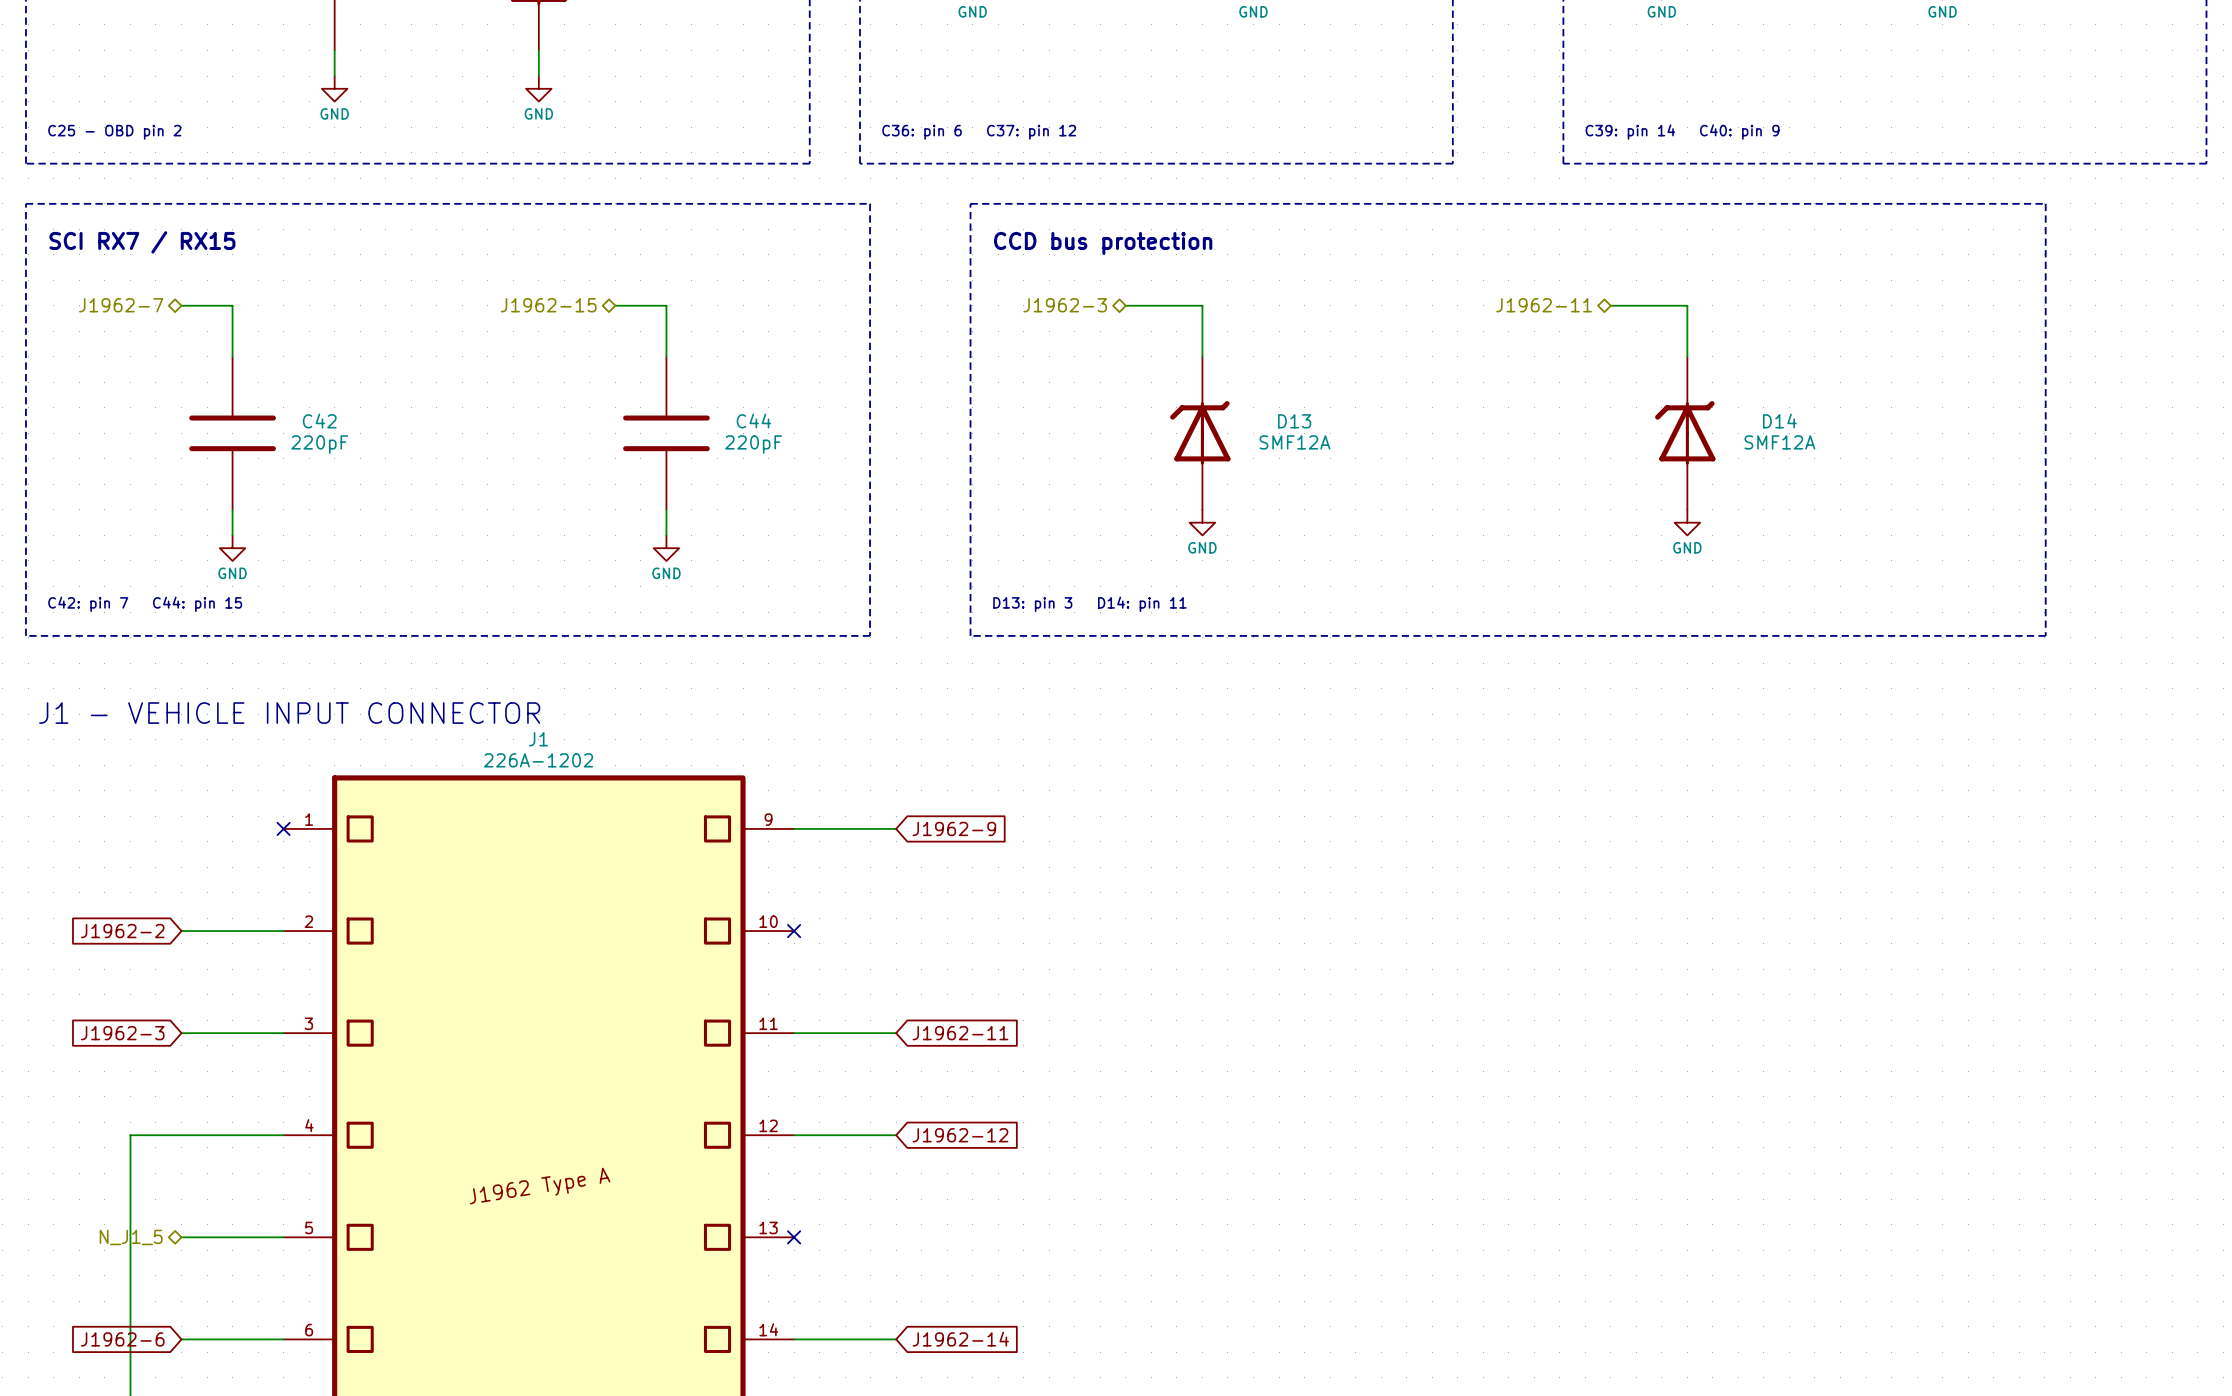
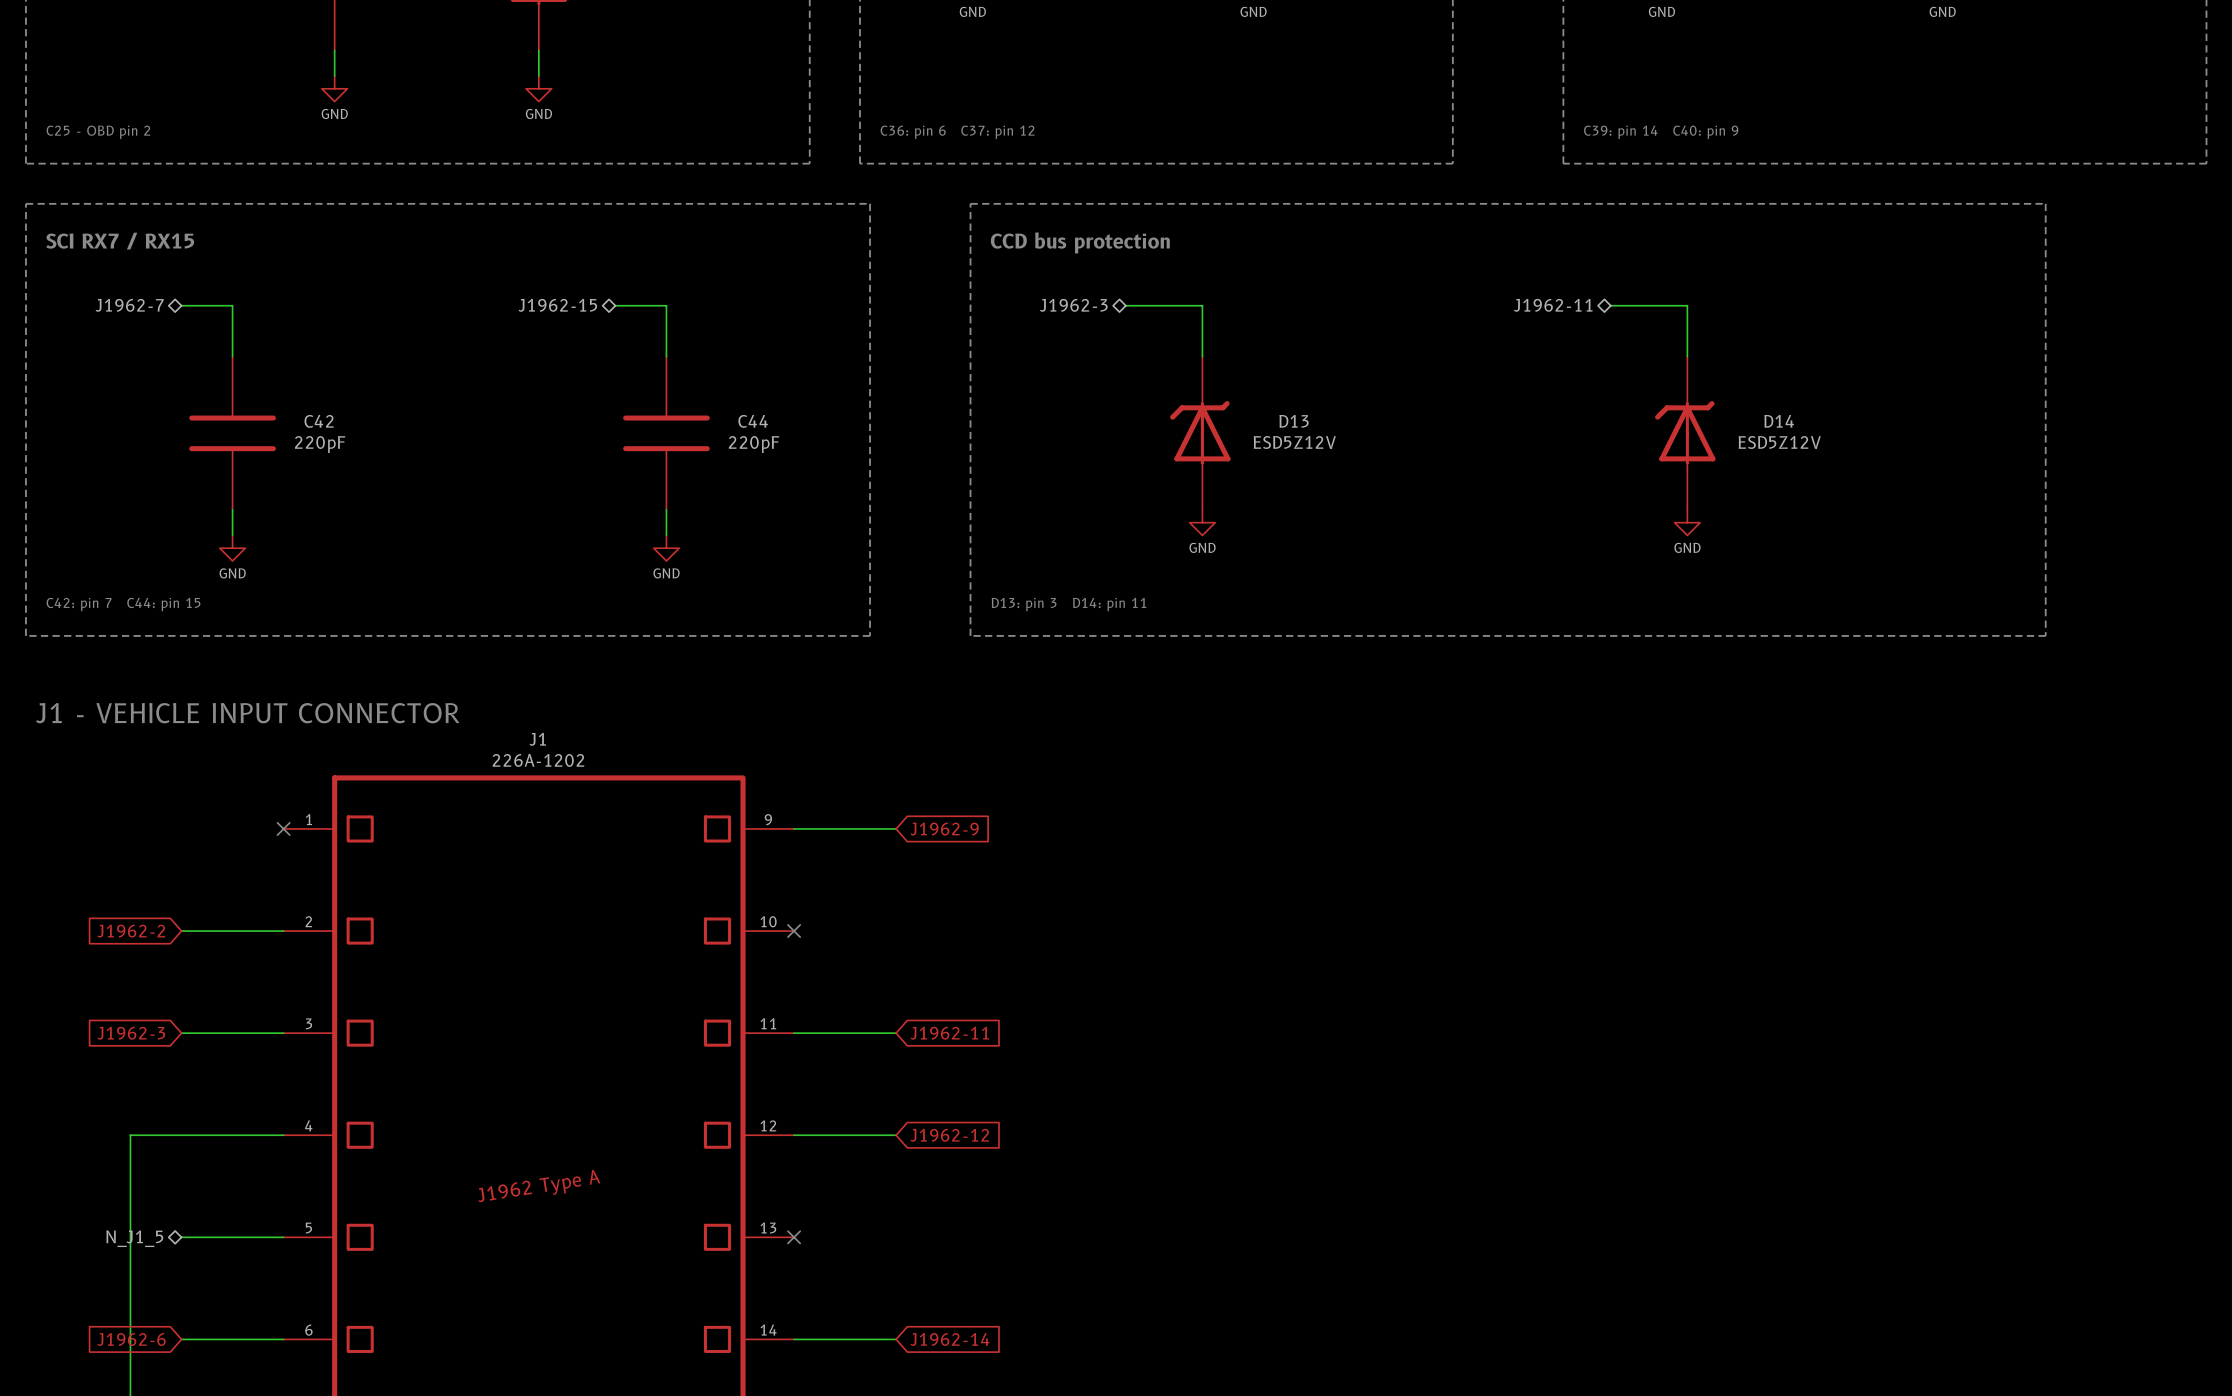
D13 value: SMF12A (1294, 442) -> ESD5Z12V (1294, 442)
D14 value: SMF12A (1779, 442) -> ESD5Z12V (1779, 442)

